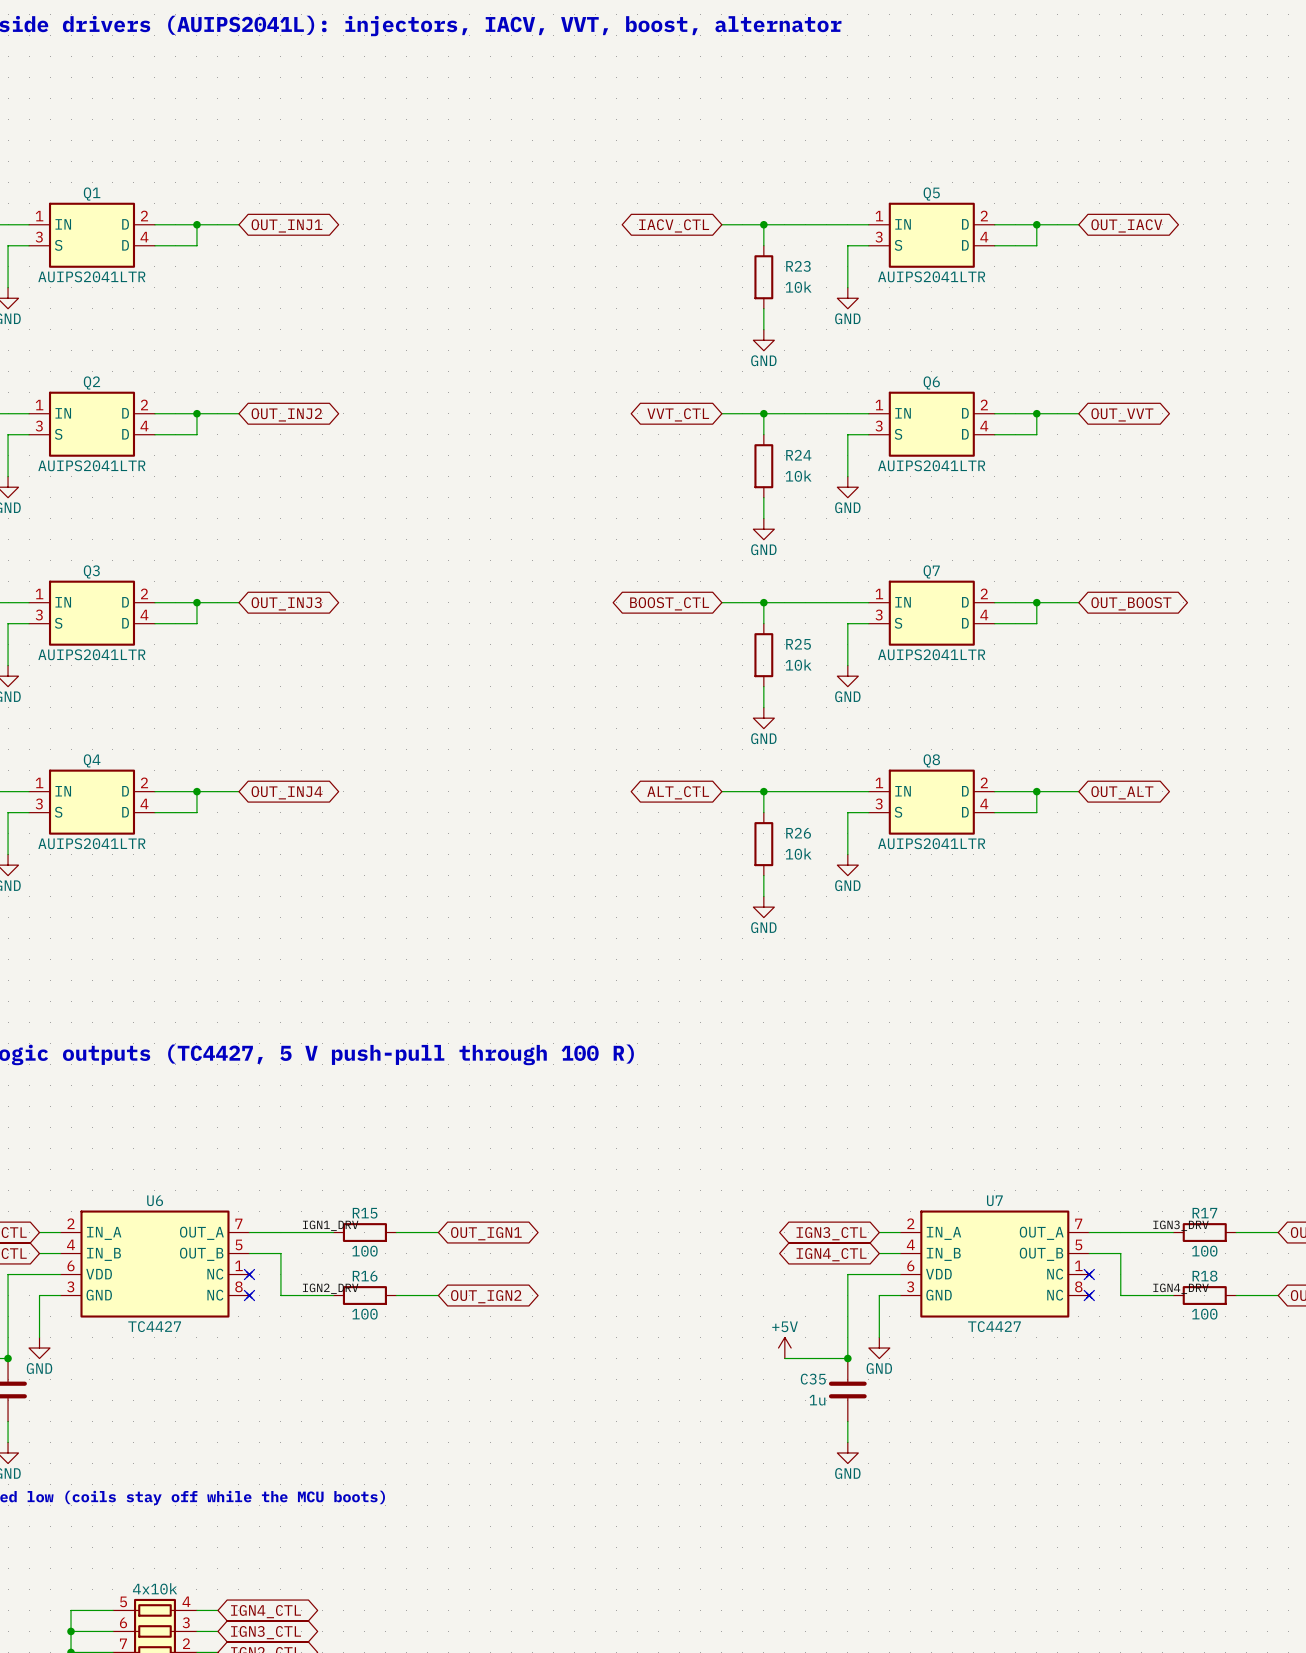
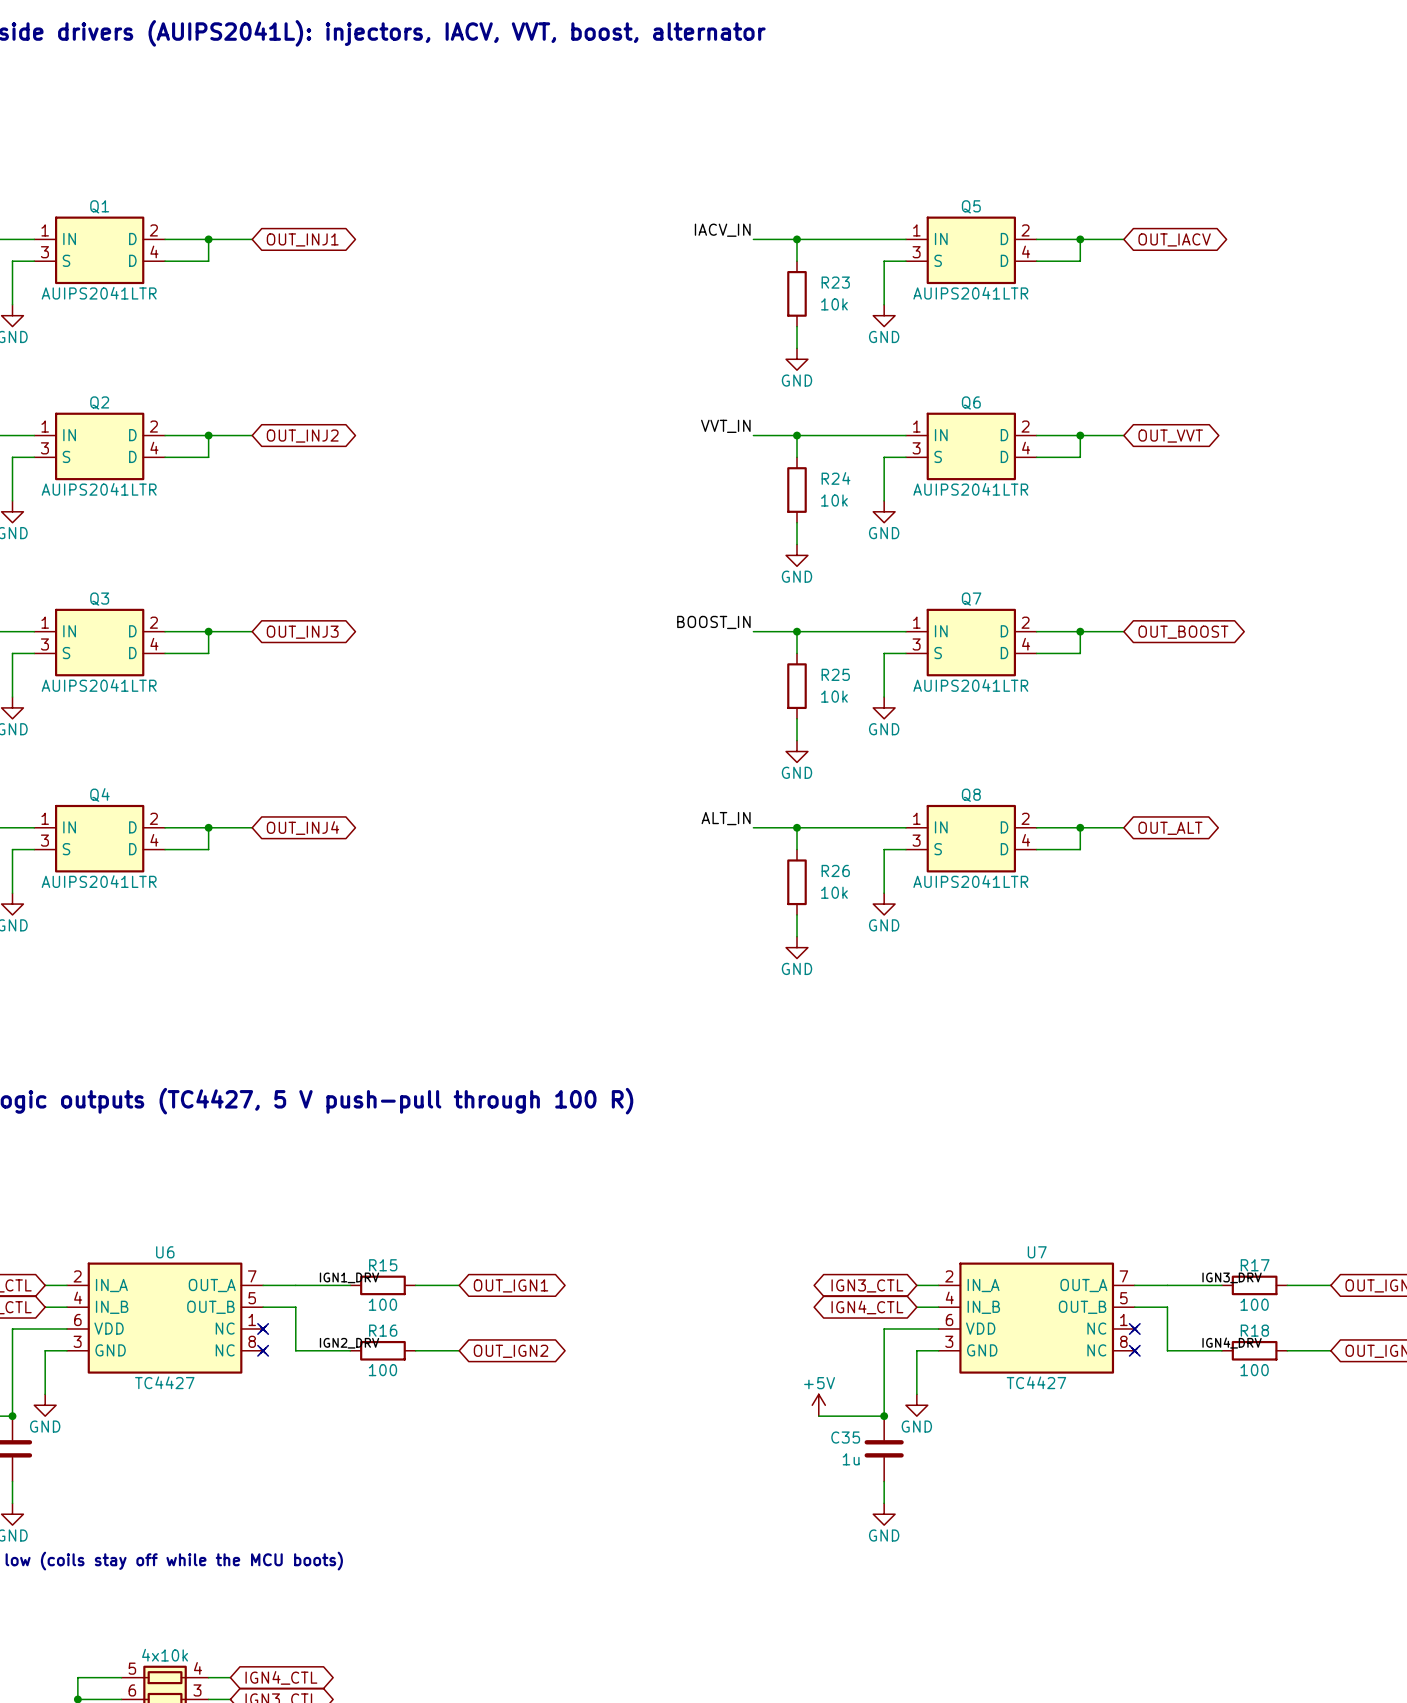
label: none -> IACV_IN (722, 230)
global label: IACV_CTL (674, 225) -> none
label: none -> VVT_IN (725, 426)
global label: VVT_CTL (678, 414) -> none
label: none -> BOOST_IN (713, 622)
global label: BOOST_CTL (669, 603) -> none
label: none -> ALT_IN (726, 818)
global label: ALT_CTL (678, 792) -> none

